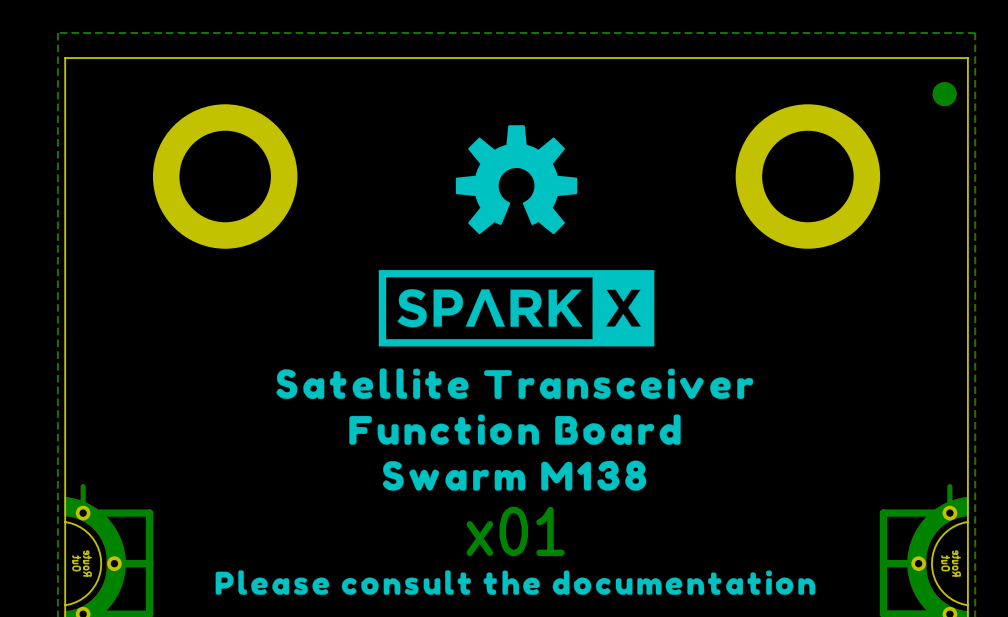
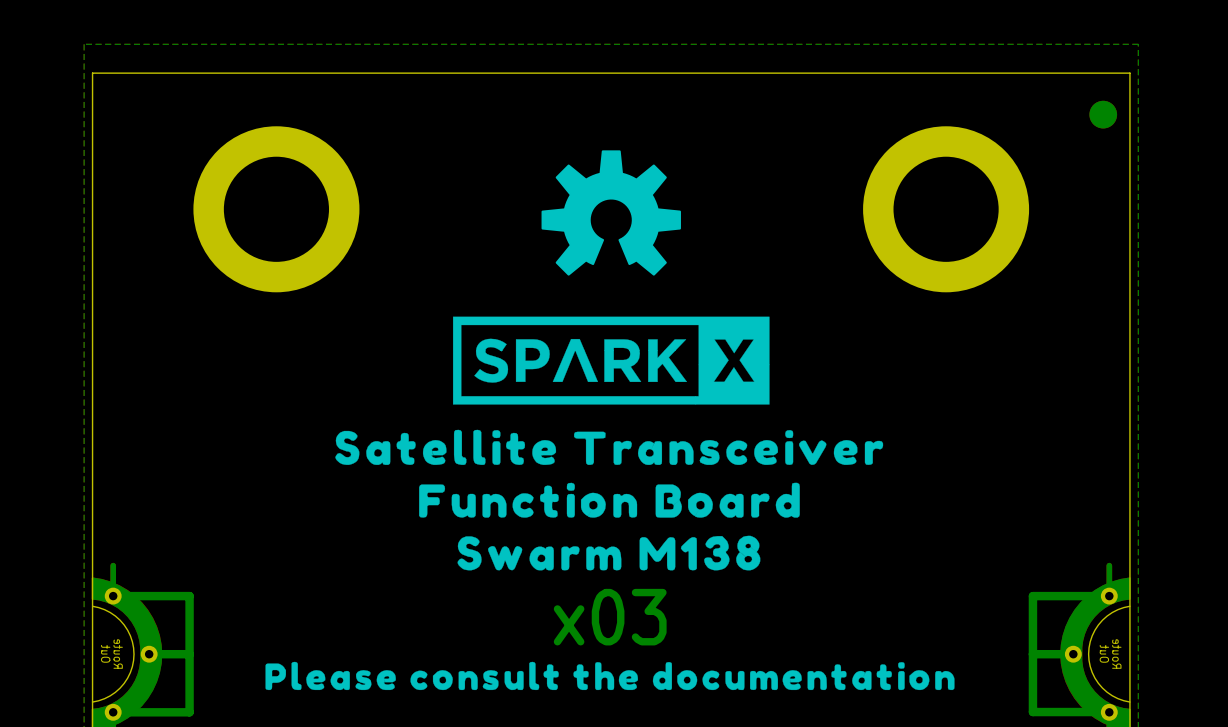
text: x01 (515, 531) -> x03 (610, 617)

